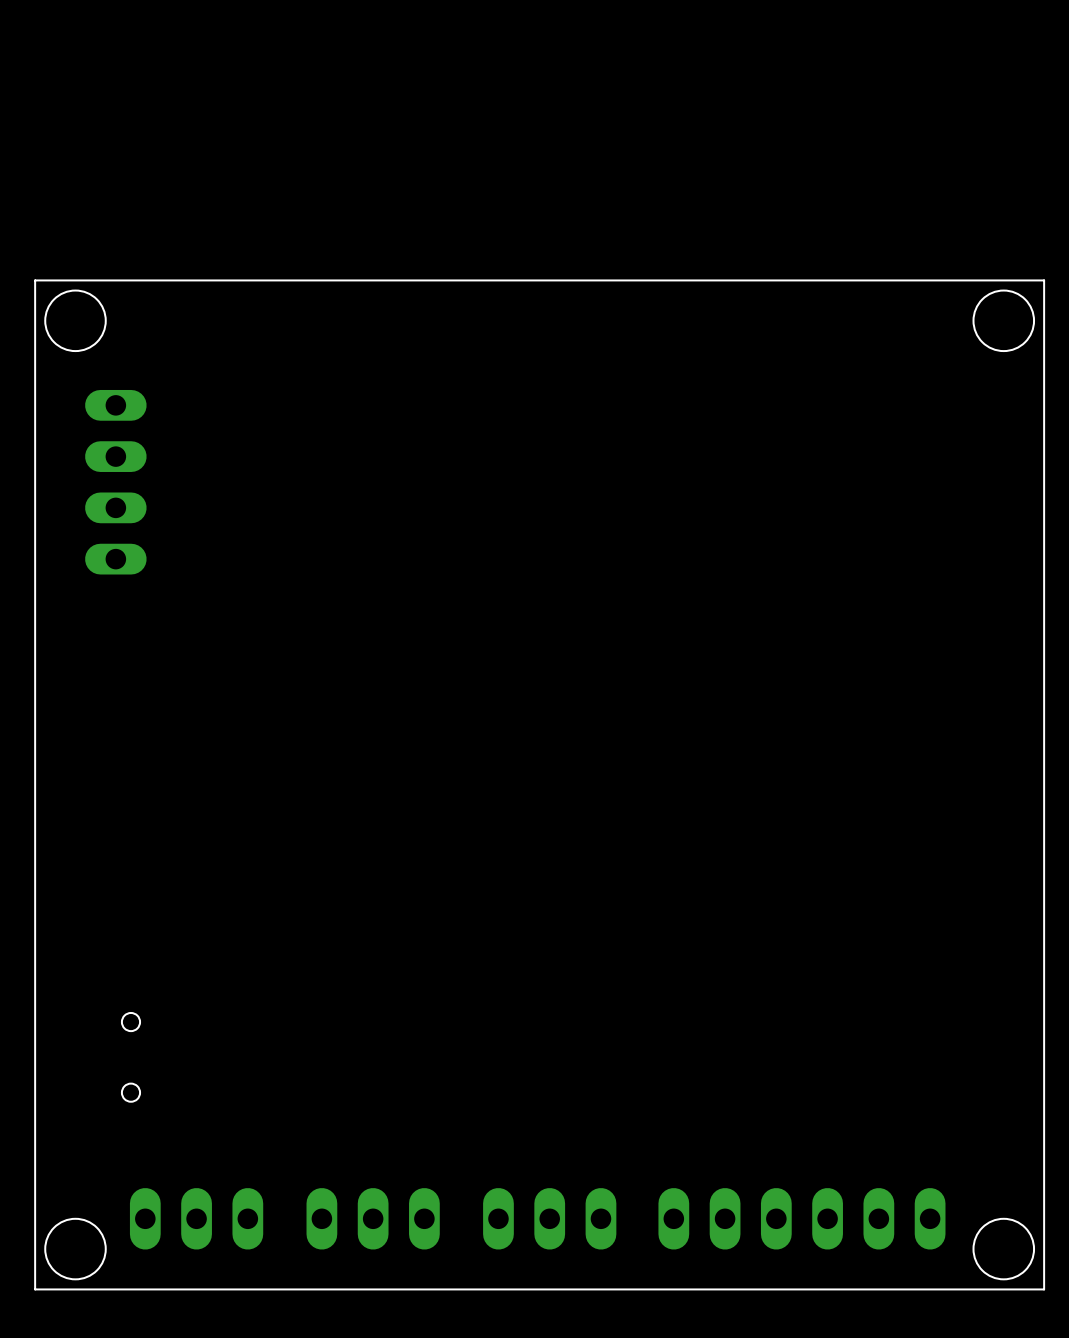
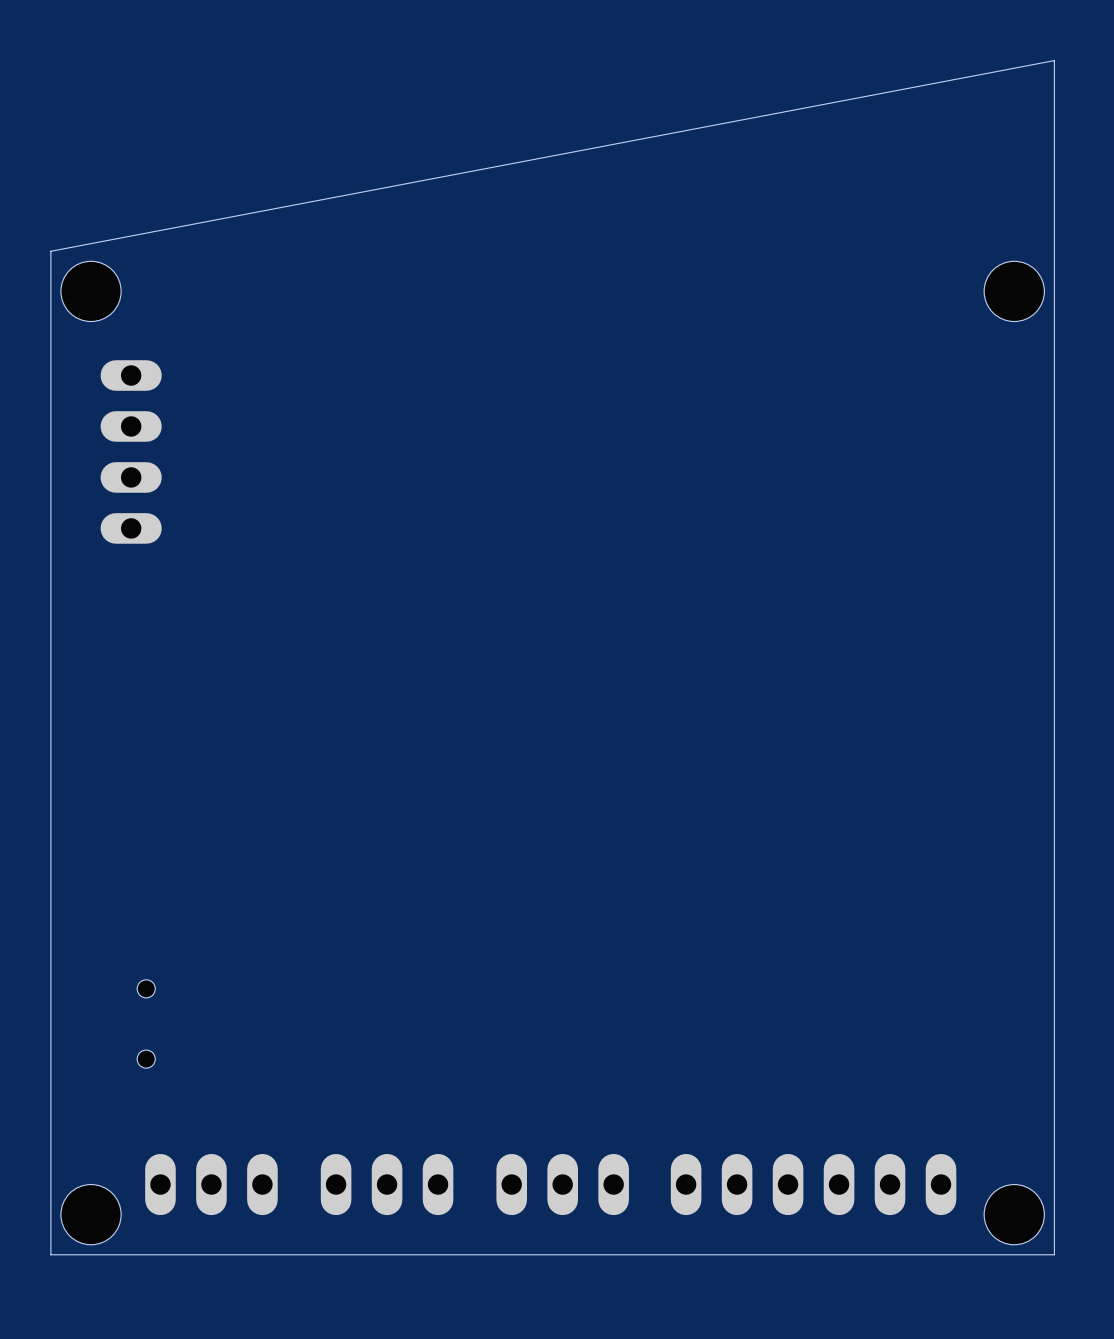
board edge: (1044, 280) (35, 280) -> (1054, 251) (1054, 60) (50, 251)

